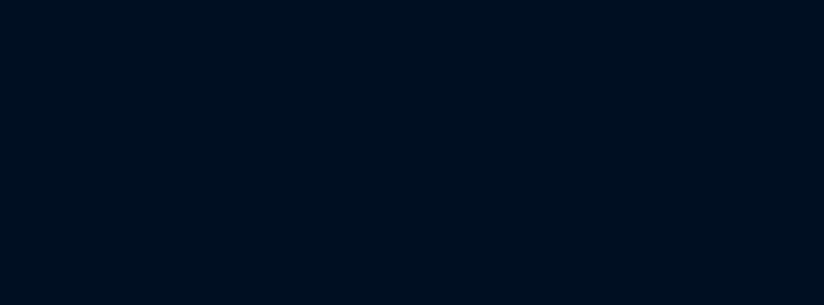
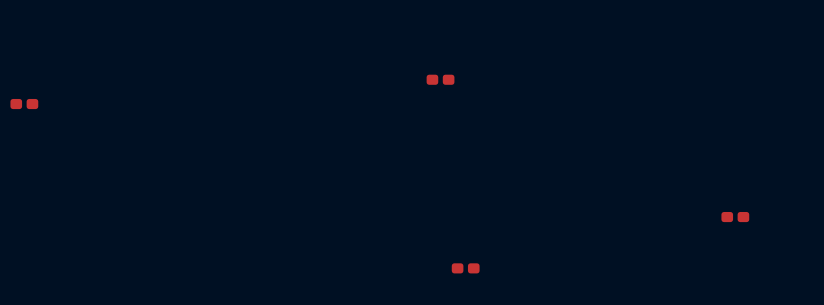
part: none -> (440, 79)
part: none -> (24, 104)
part: none -> (735, 217)
part: none -> (465, 268)

